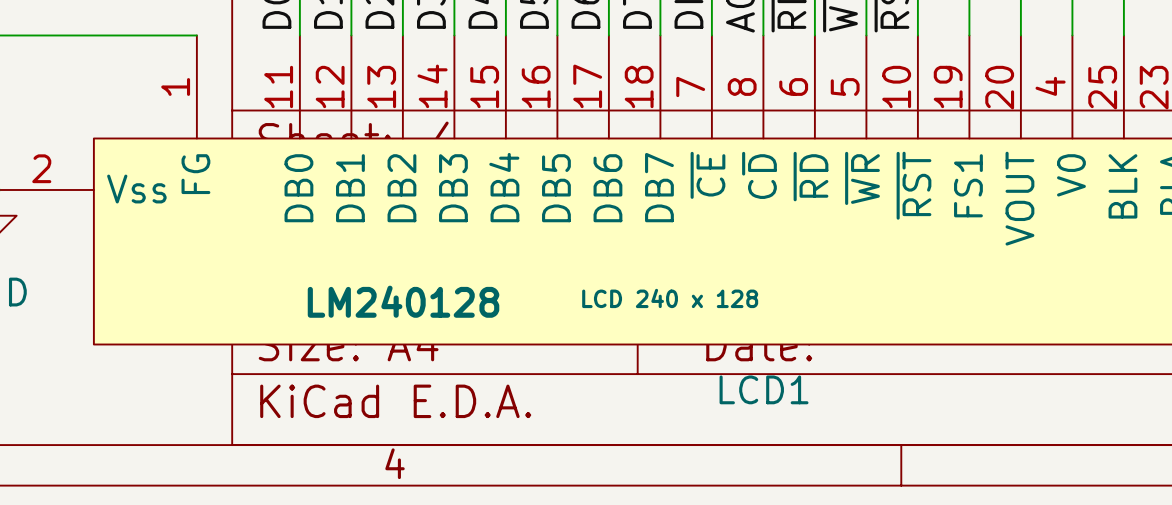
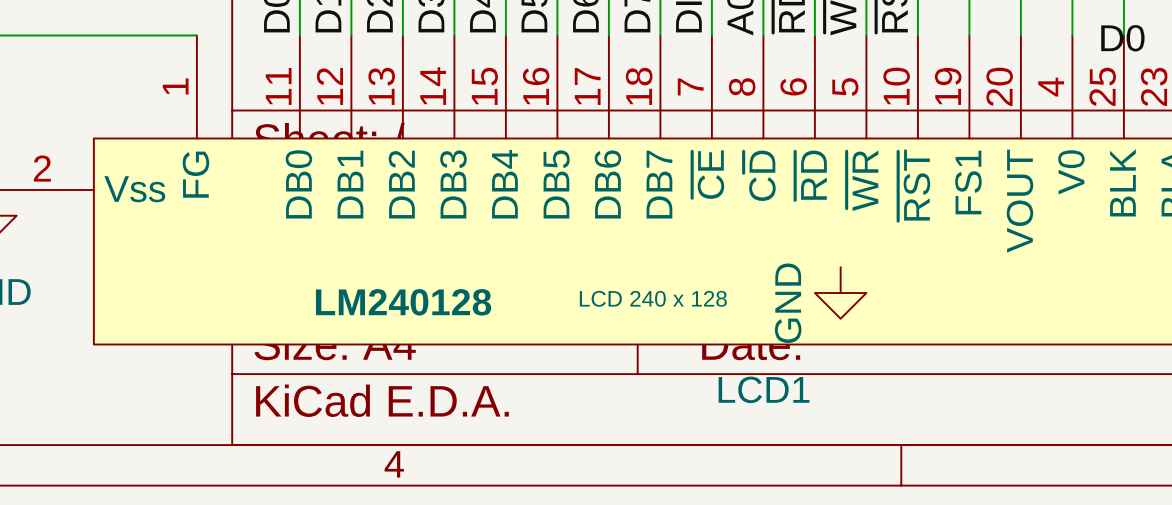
label: none -> D0 (1122, 38)
power symbol: none -> GND (840, 292)

